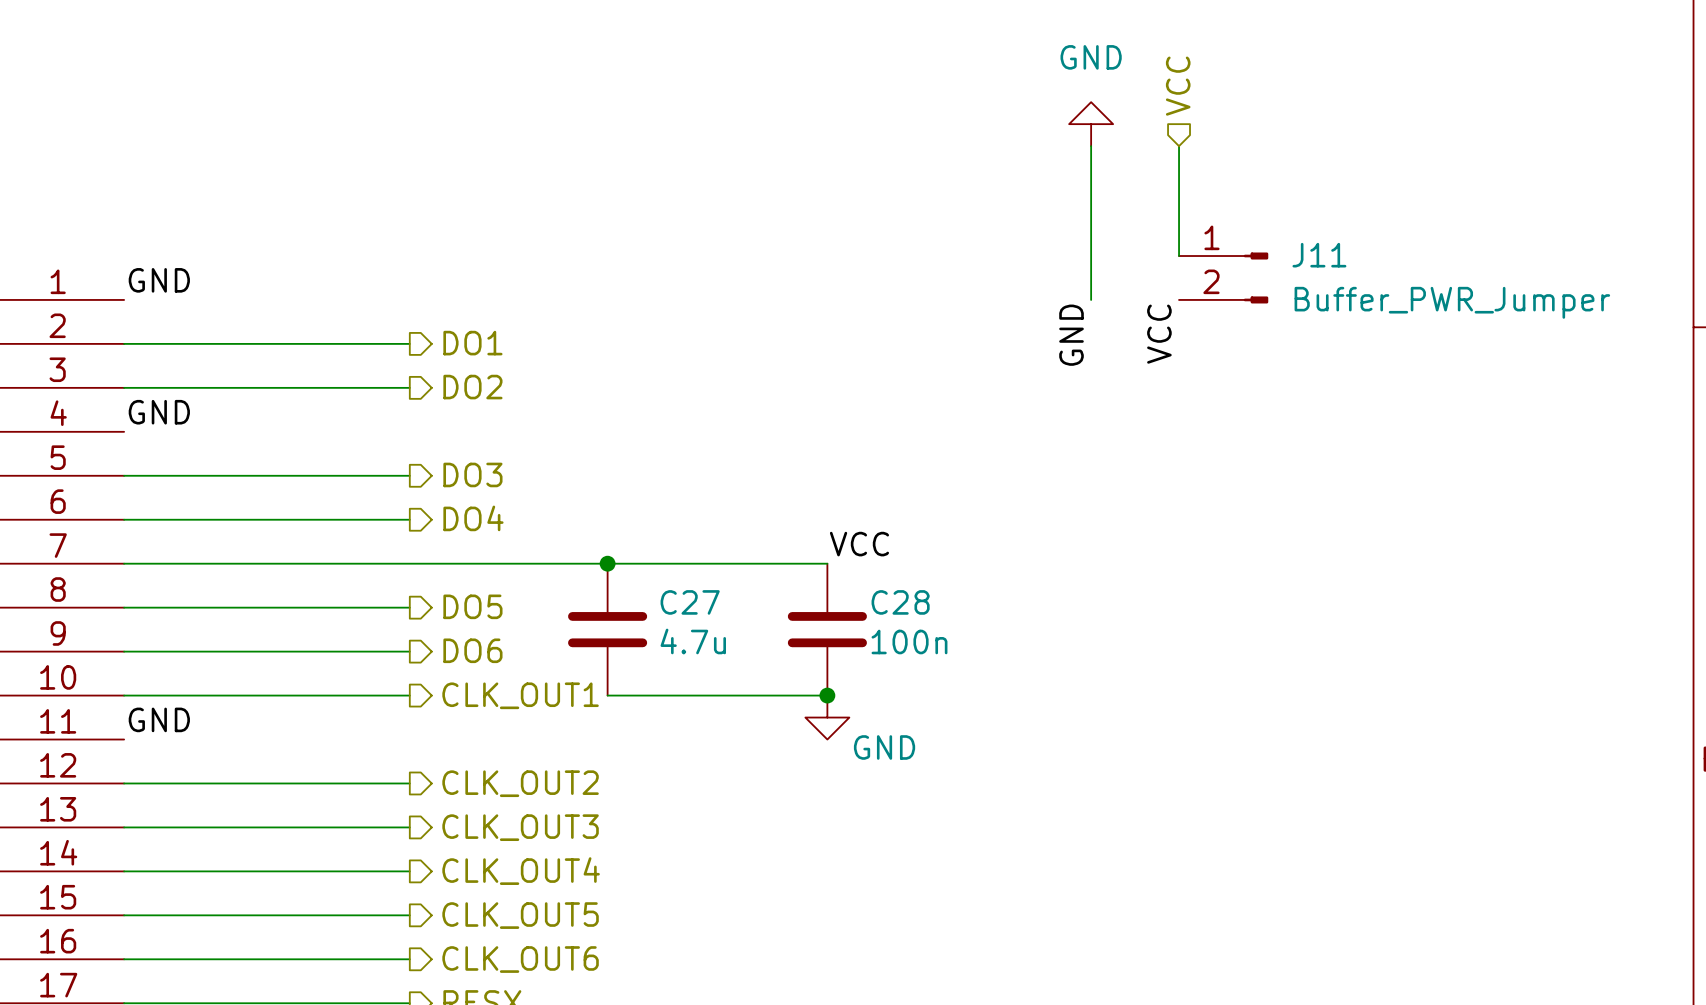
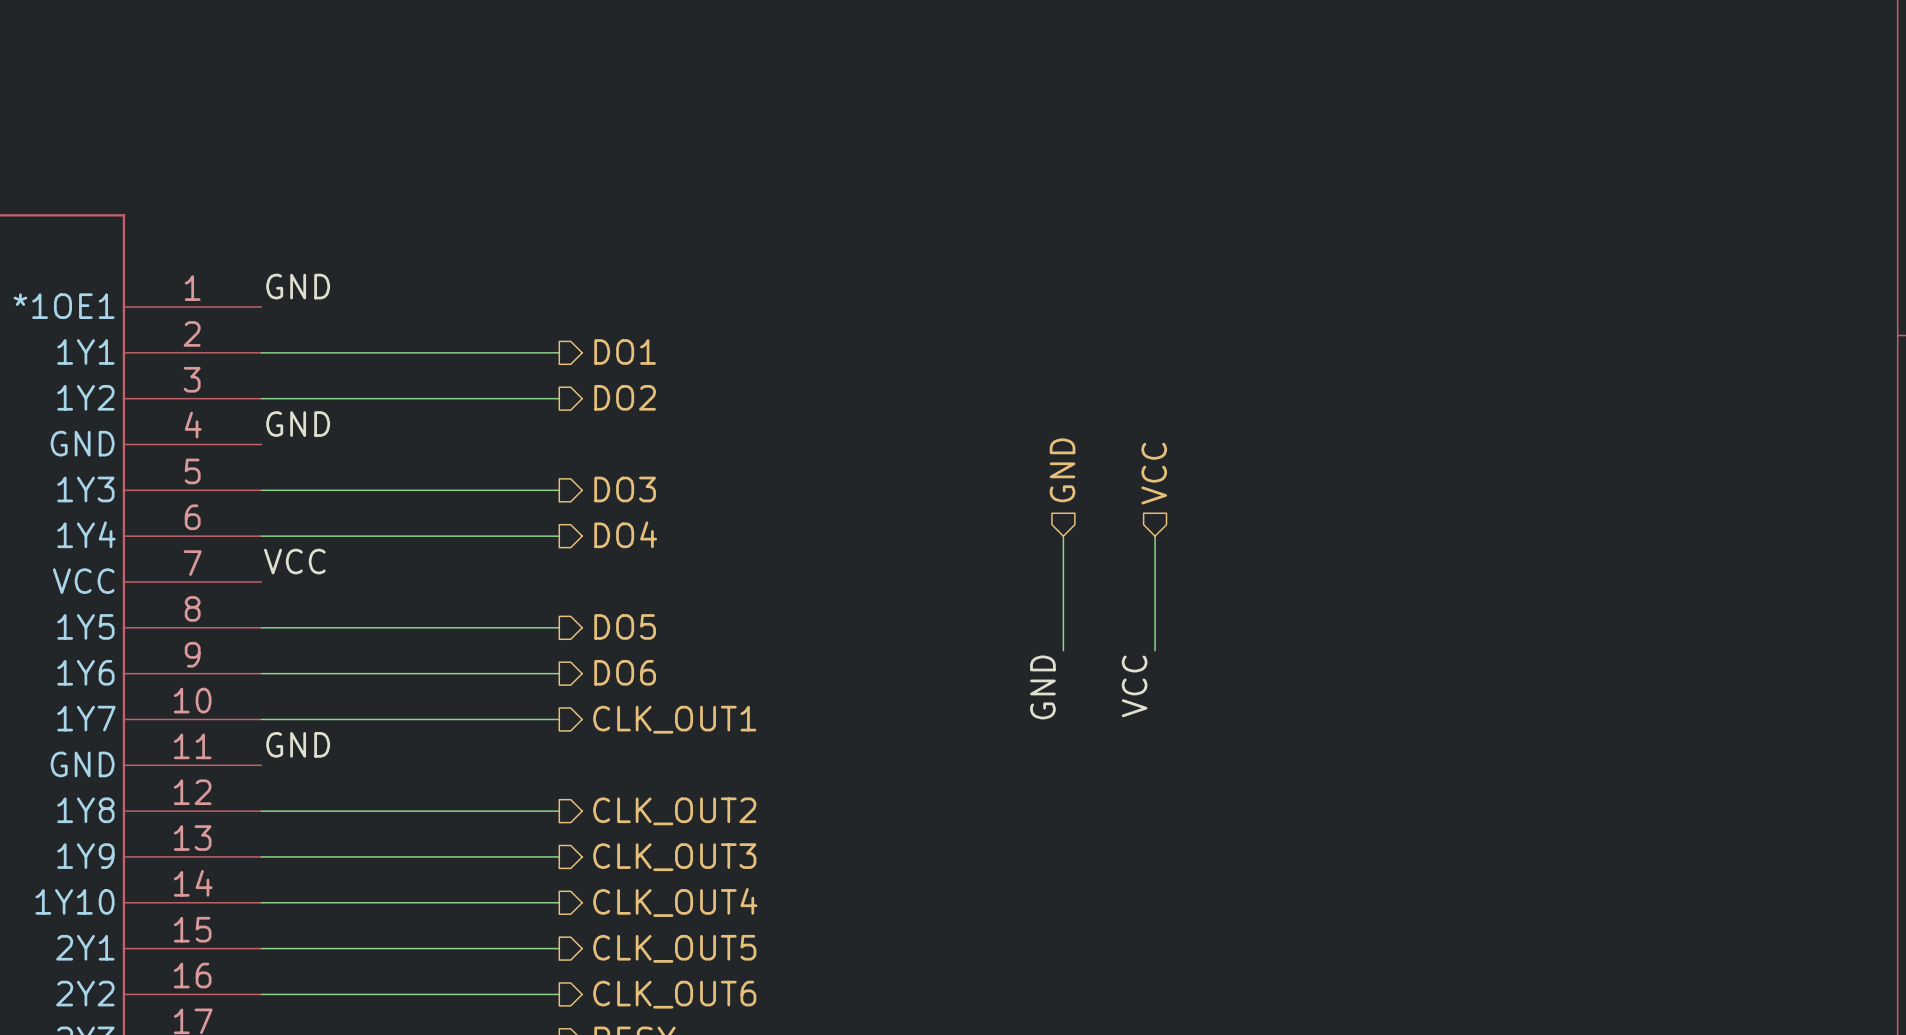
hierarchical label position: VCC (1178, 86) -> VCC (1154, 473)
power symbol: GND (1091, 124) -> none
wire: (1091, 146) (1091, 299) -> none
wire: (1179, 146) (1179, 256) -> (1155, 536) (1155, 650)
J11: Buffer_PWR_Jumper (1223, 277) -> none
label: VCC (1159, 334) -> none
label position: GND (1071, 335) -> GND (1042, 687)
hierarchical label: none -> GND (1062, 470)
wire: none -> (1063, 536) (1063, 650)
label: none -> VCC (294, 561)
label rotation: 0° (859, 544) -> 90° counterclockwise (1134, 686)
label position: VCC (859, 544) -> VCC (1134, 686)
wire: (124, 563) (827, 563) -> none
junction: (607, 563) -> none
C27: 4.7u (607, 629) -> none
C28: 100n (827, 629) -> none
wire: (607, 695) (827, 695) -> none
junction: (827, 695) -> none
power symbol: GND (827, 717) -> none

